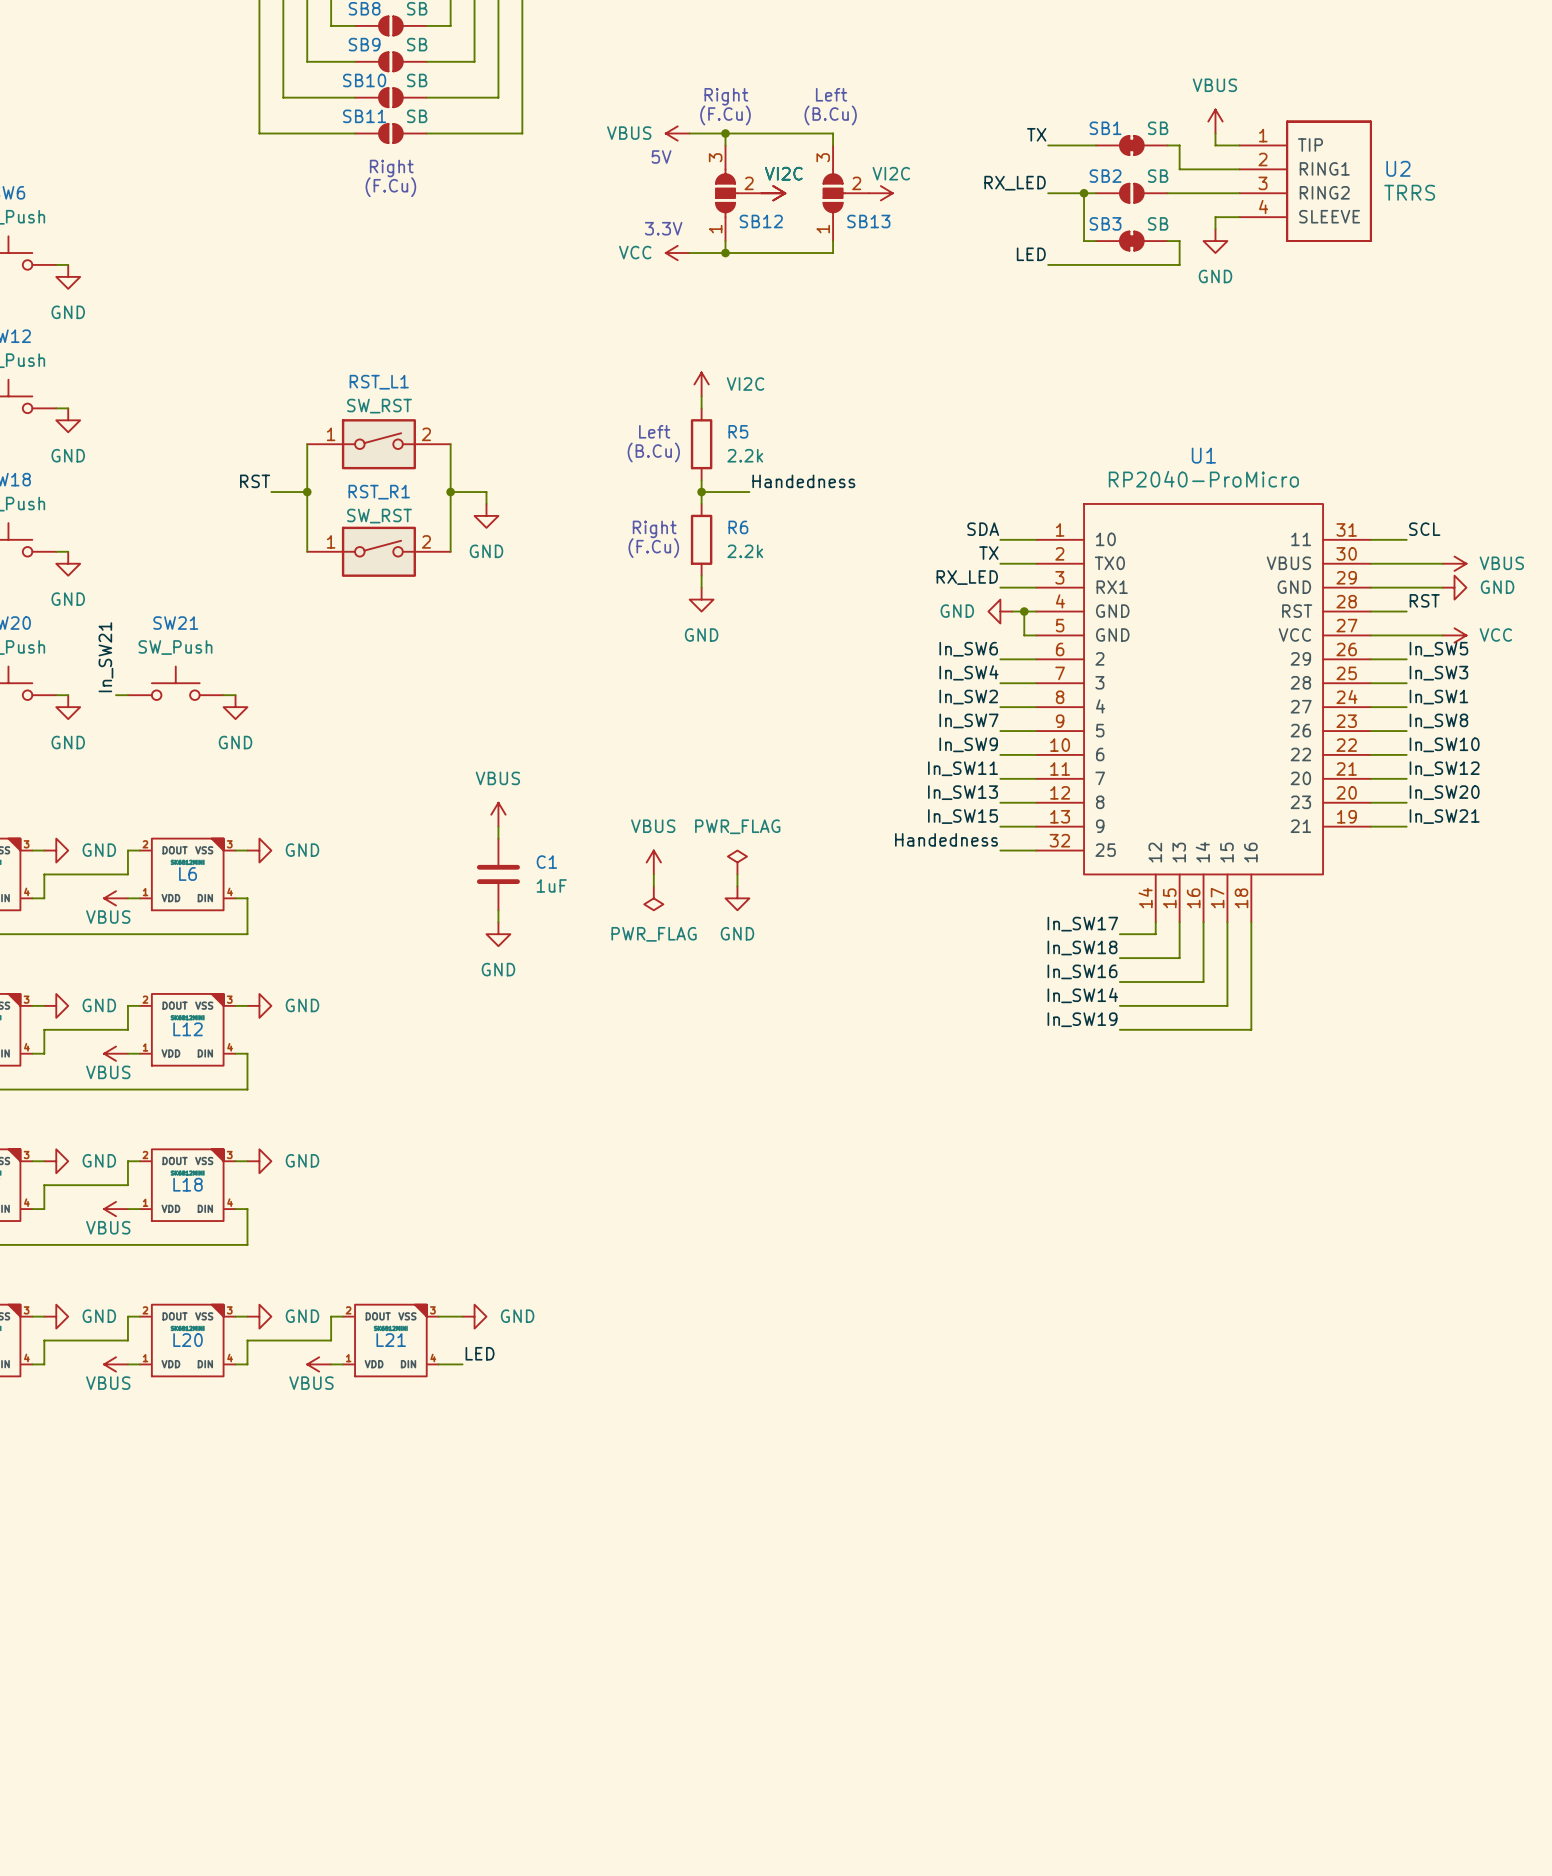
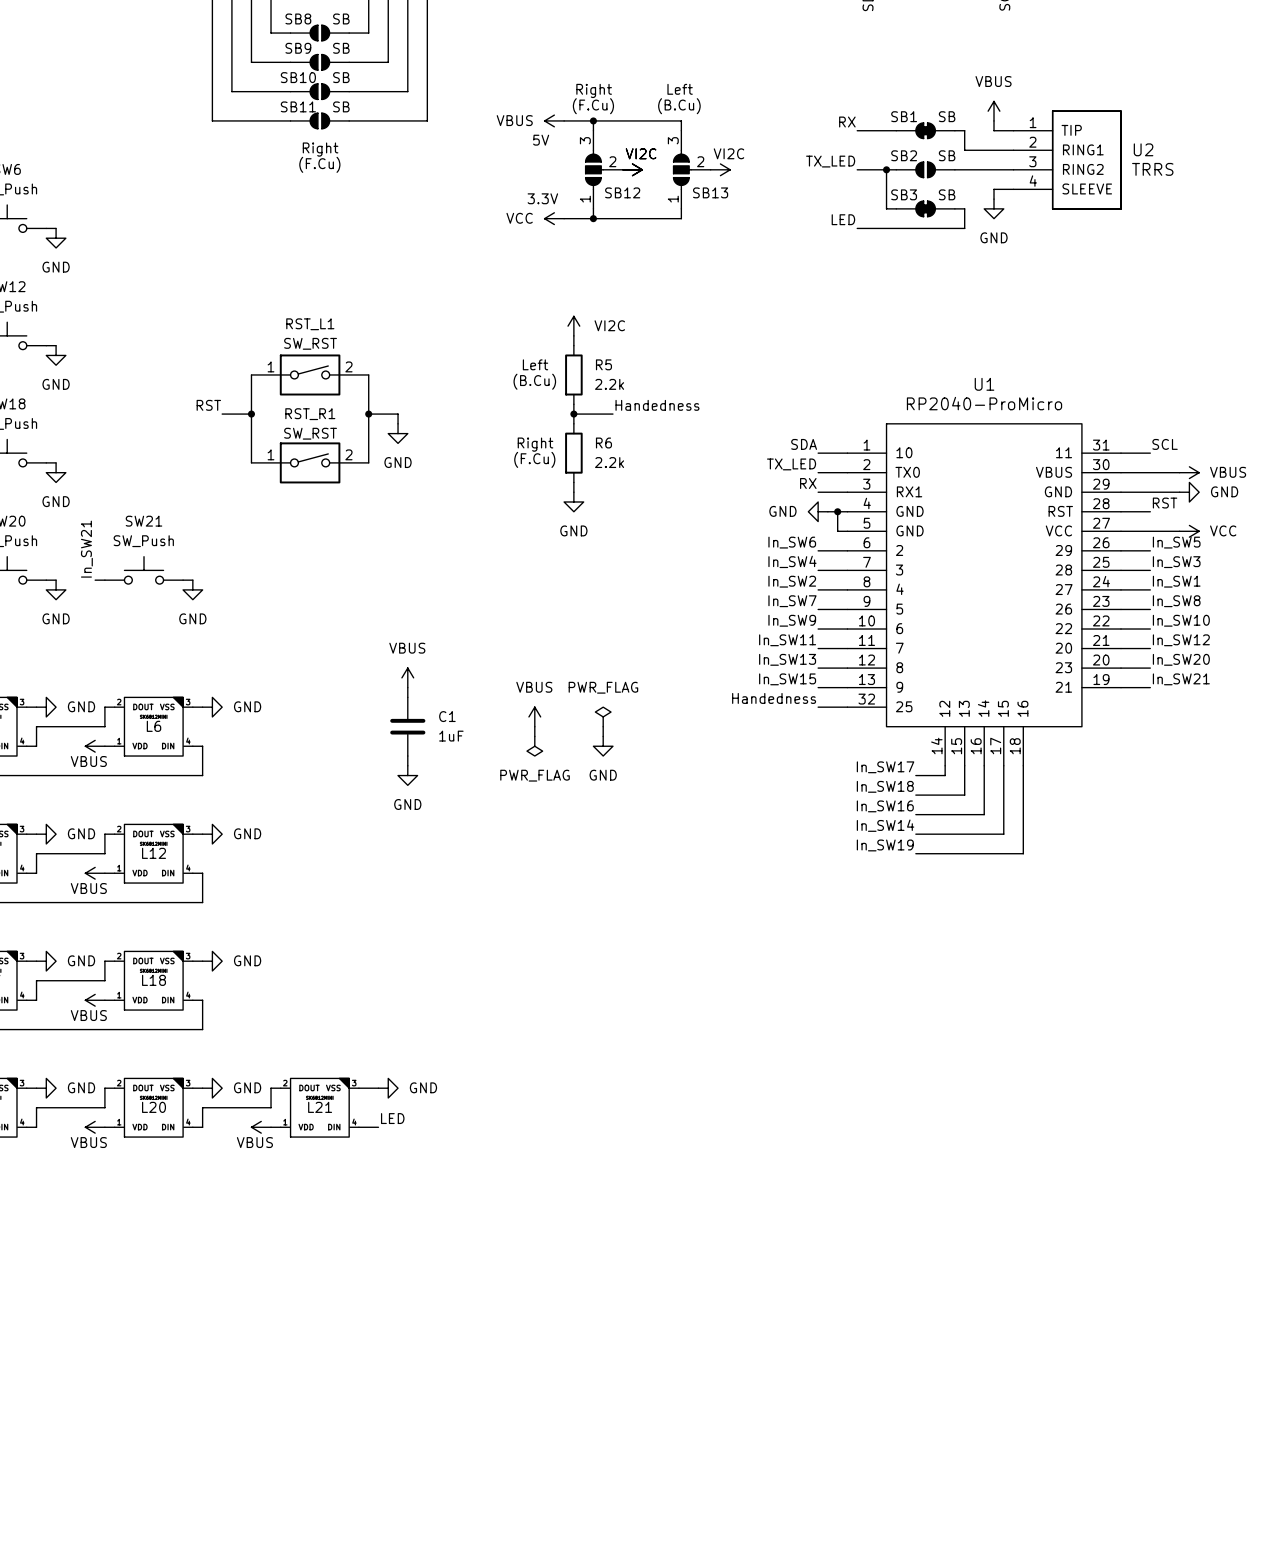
label: TX (1036, 134) -> RX (847, 122)
label: RX_LED (1015, 183) -> TX_LED (830, 161)
label: TX (988, 553) -> TX_LED (791, 464)
label: RX_LED (967, 577) -> RX (808, 483)

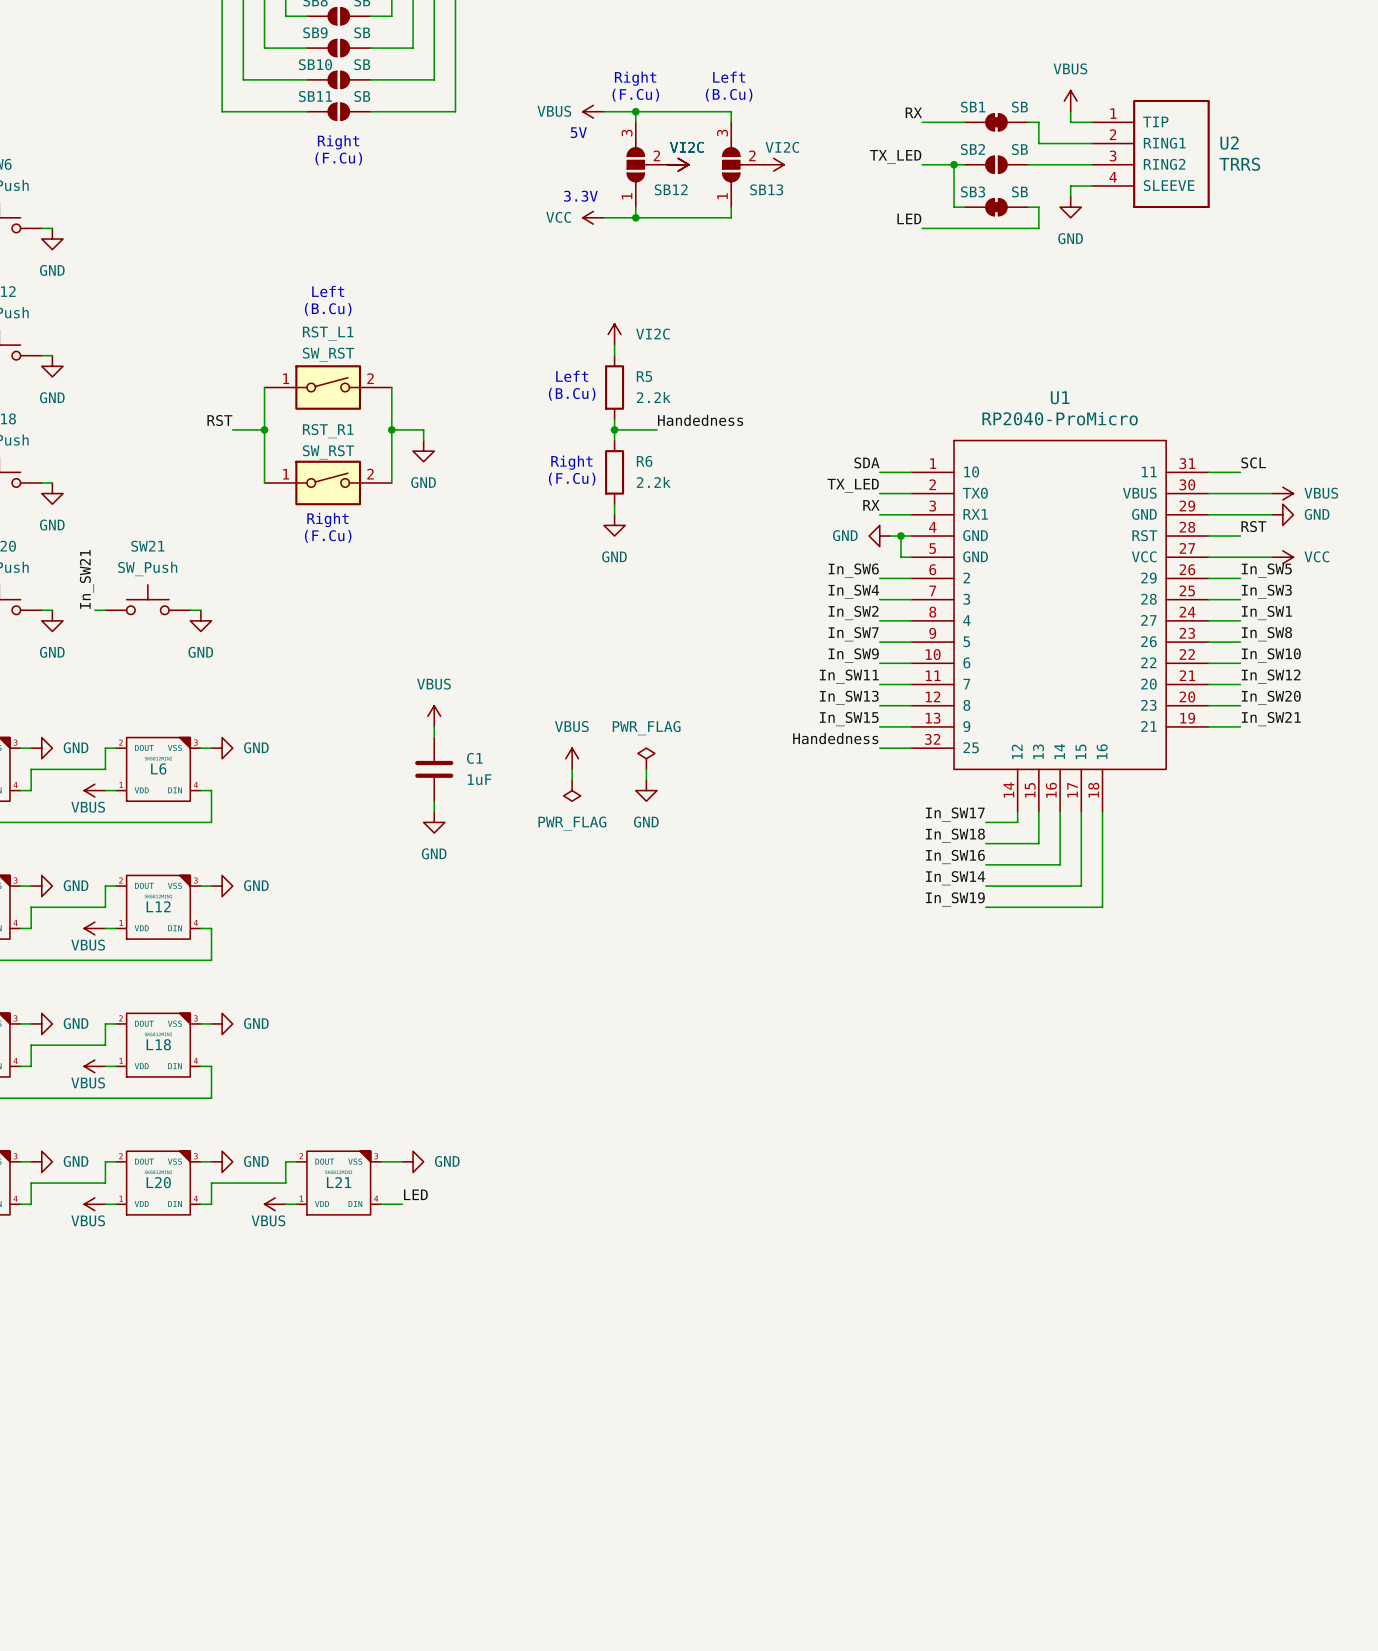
text: none -> Left (328, 291)
text: none -> (B.Cu) (328, 309)
text: none -> Right (327, 519)
text: none -> (F.Cu) (328, 536)

